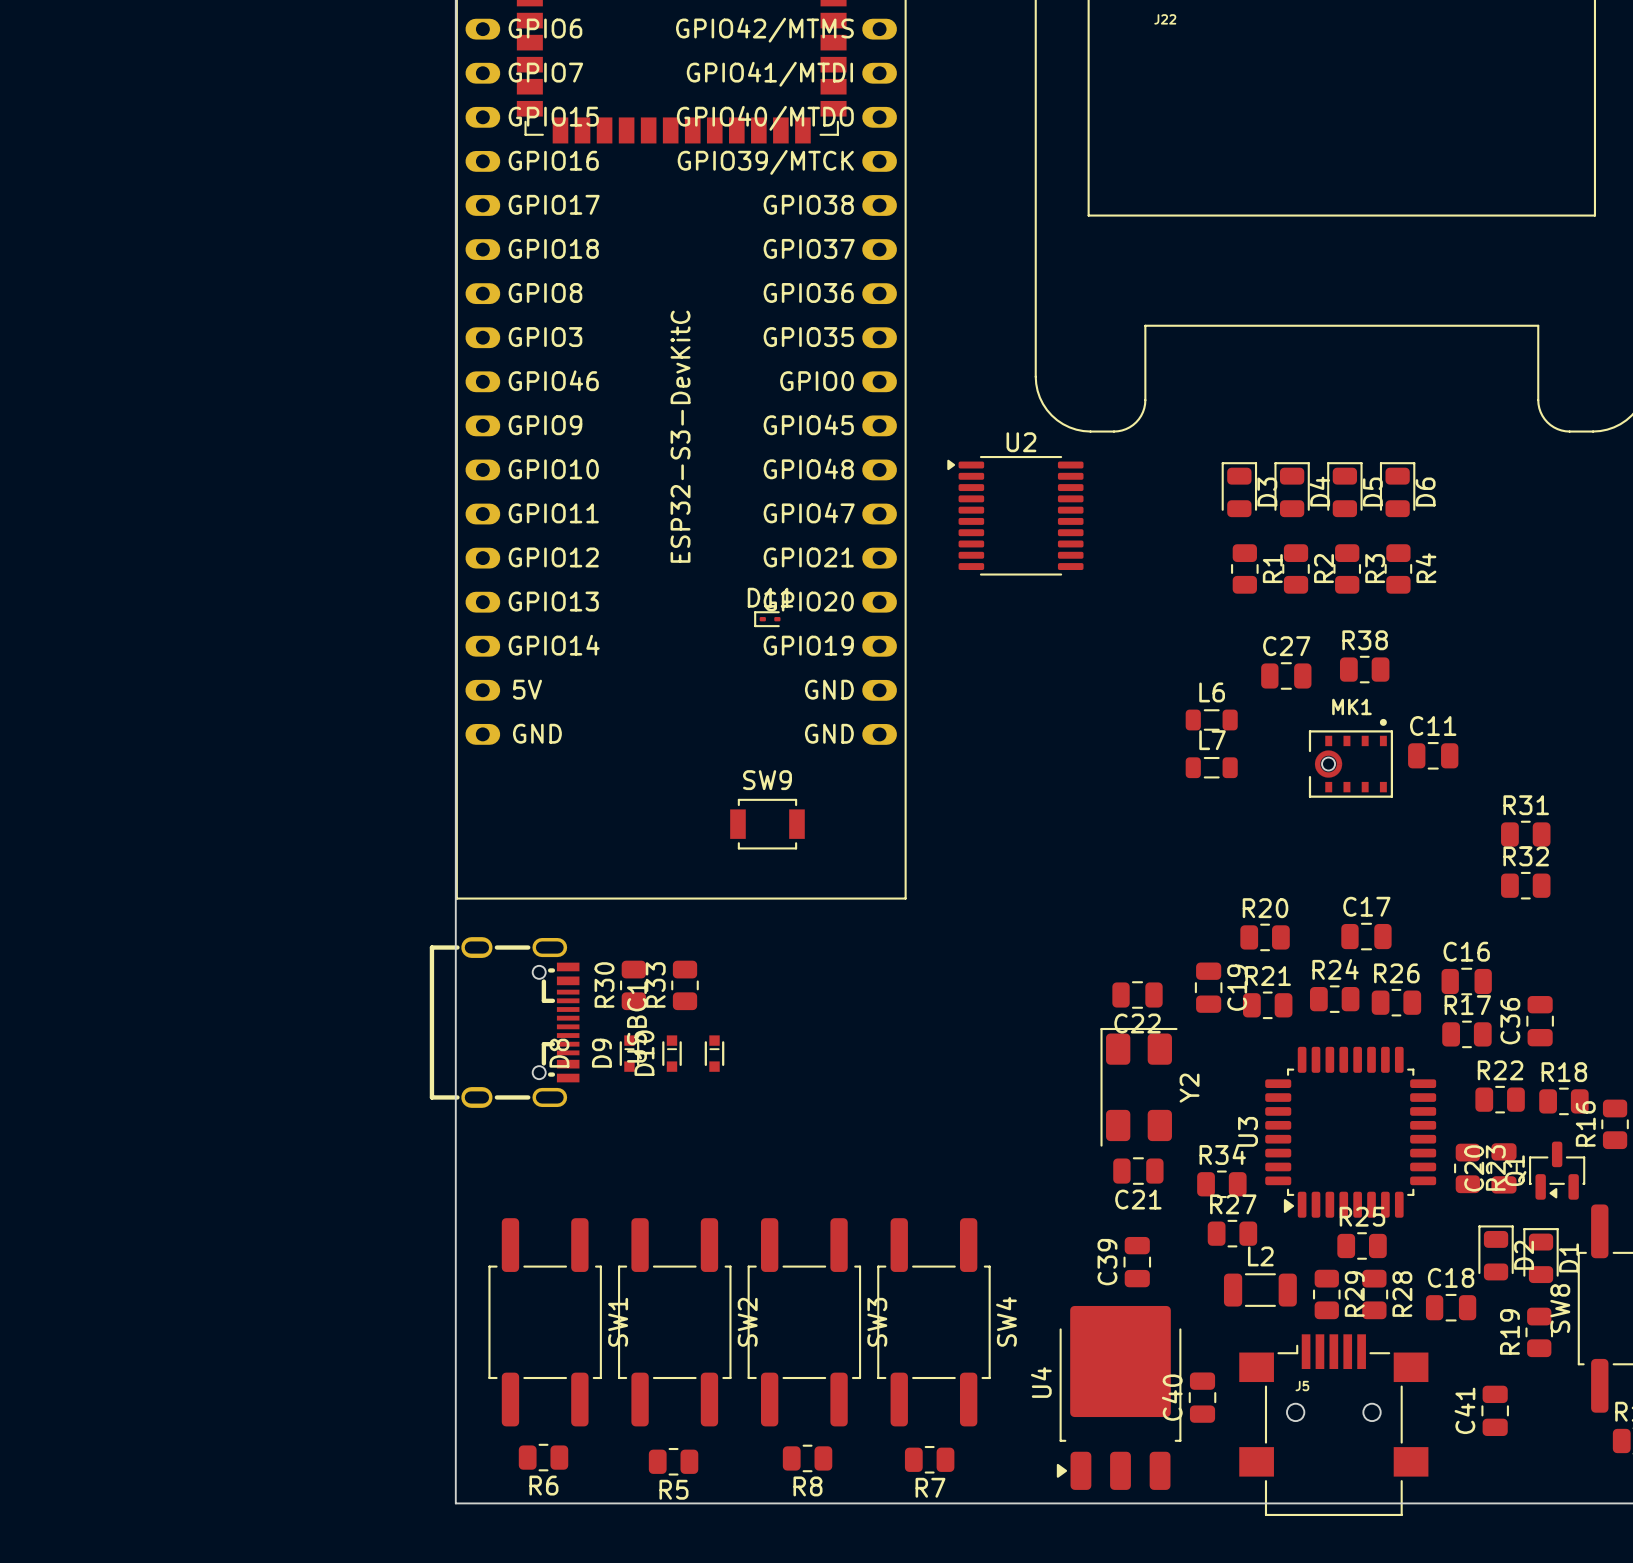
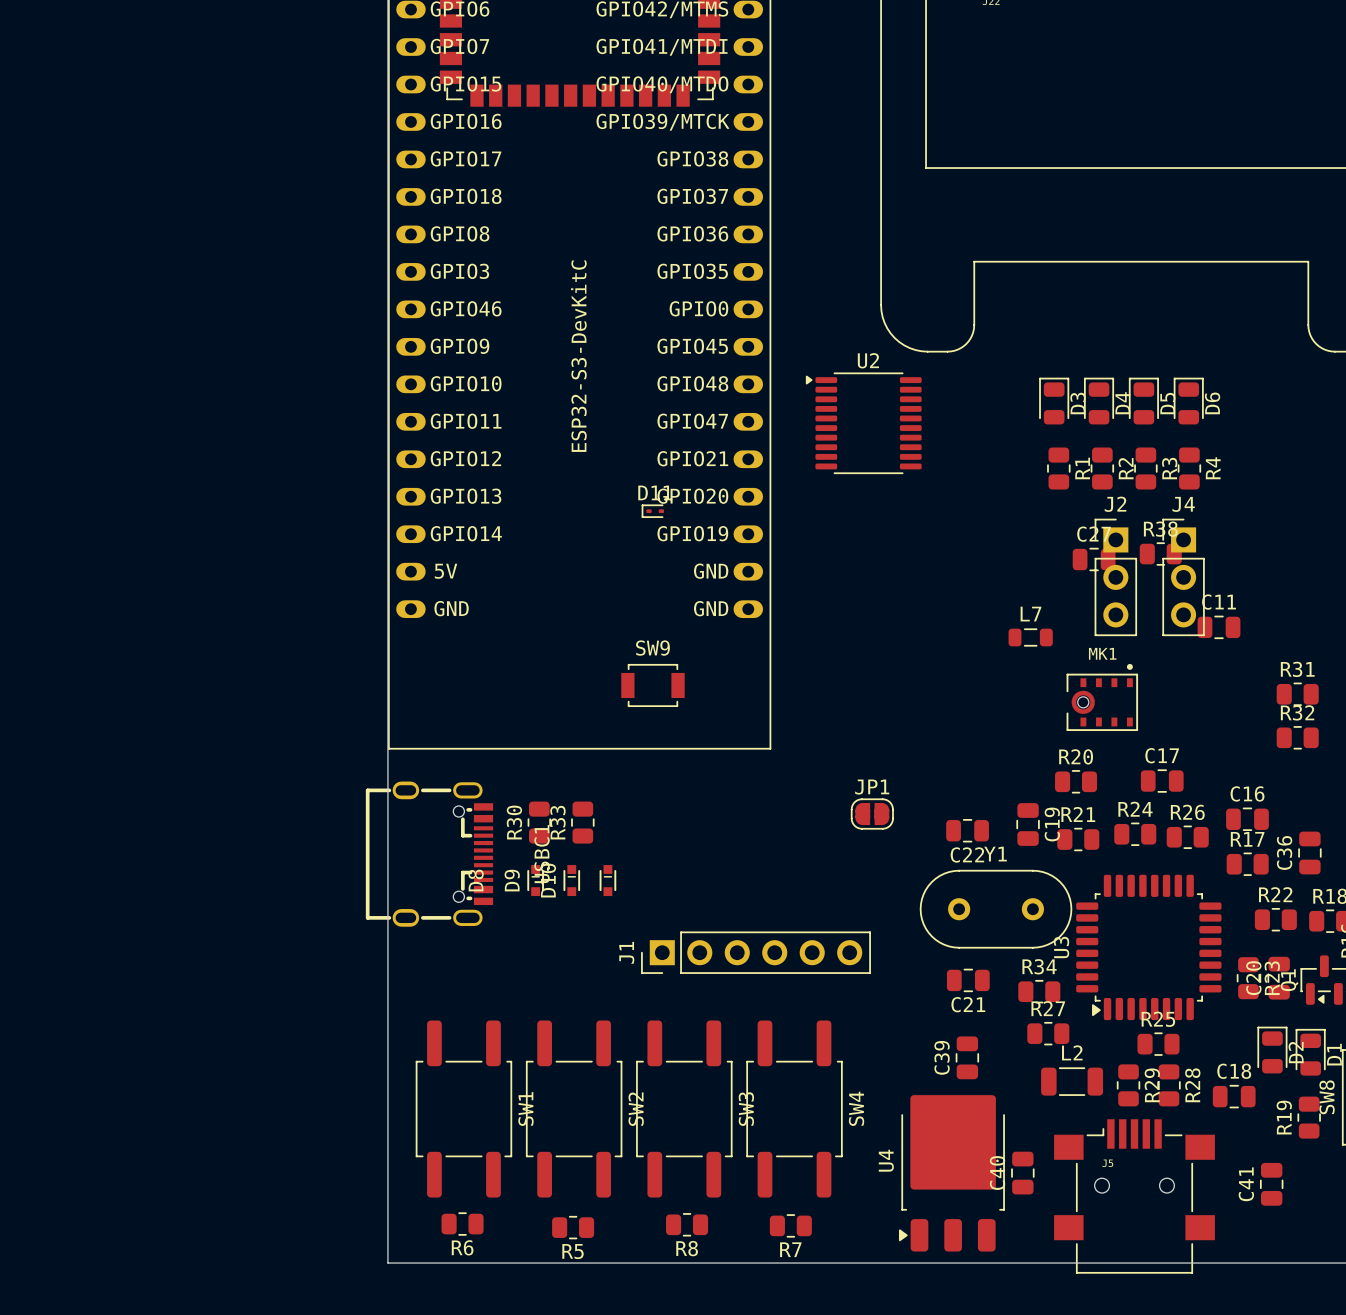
J2: none -> (1115, 577)
J4: none -> (1183, 577)
L6: (1211, 719) -> none
MK1 position: (1350, 758) -> (1102, 697)
JP1: none -> (872, 814)
Y2: (1139, 1087) -> none
Y1: none -> (996, 909)
J1: none -> (756, 952)

